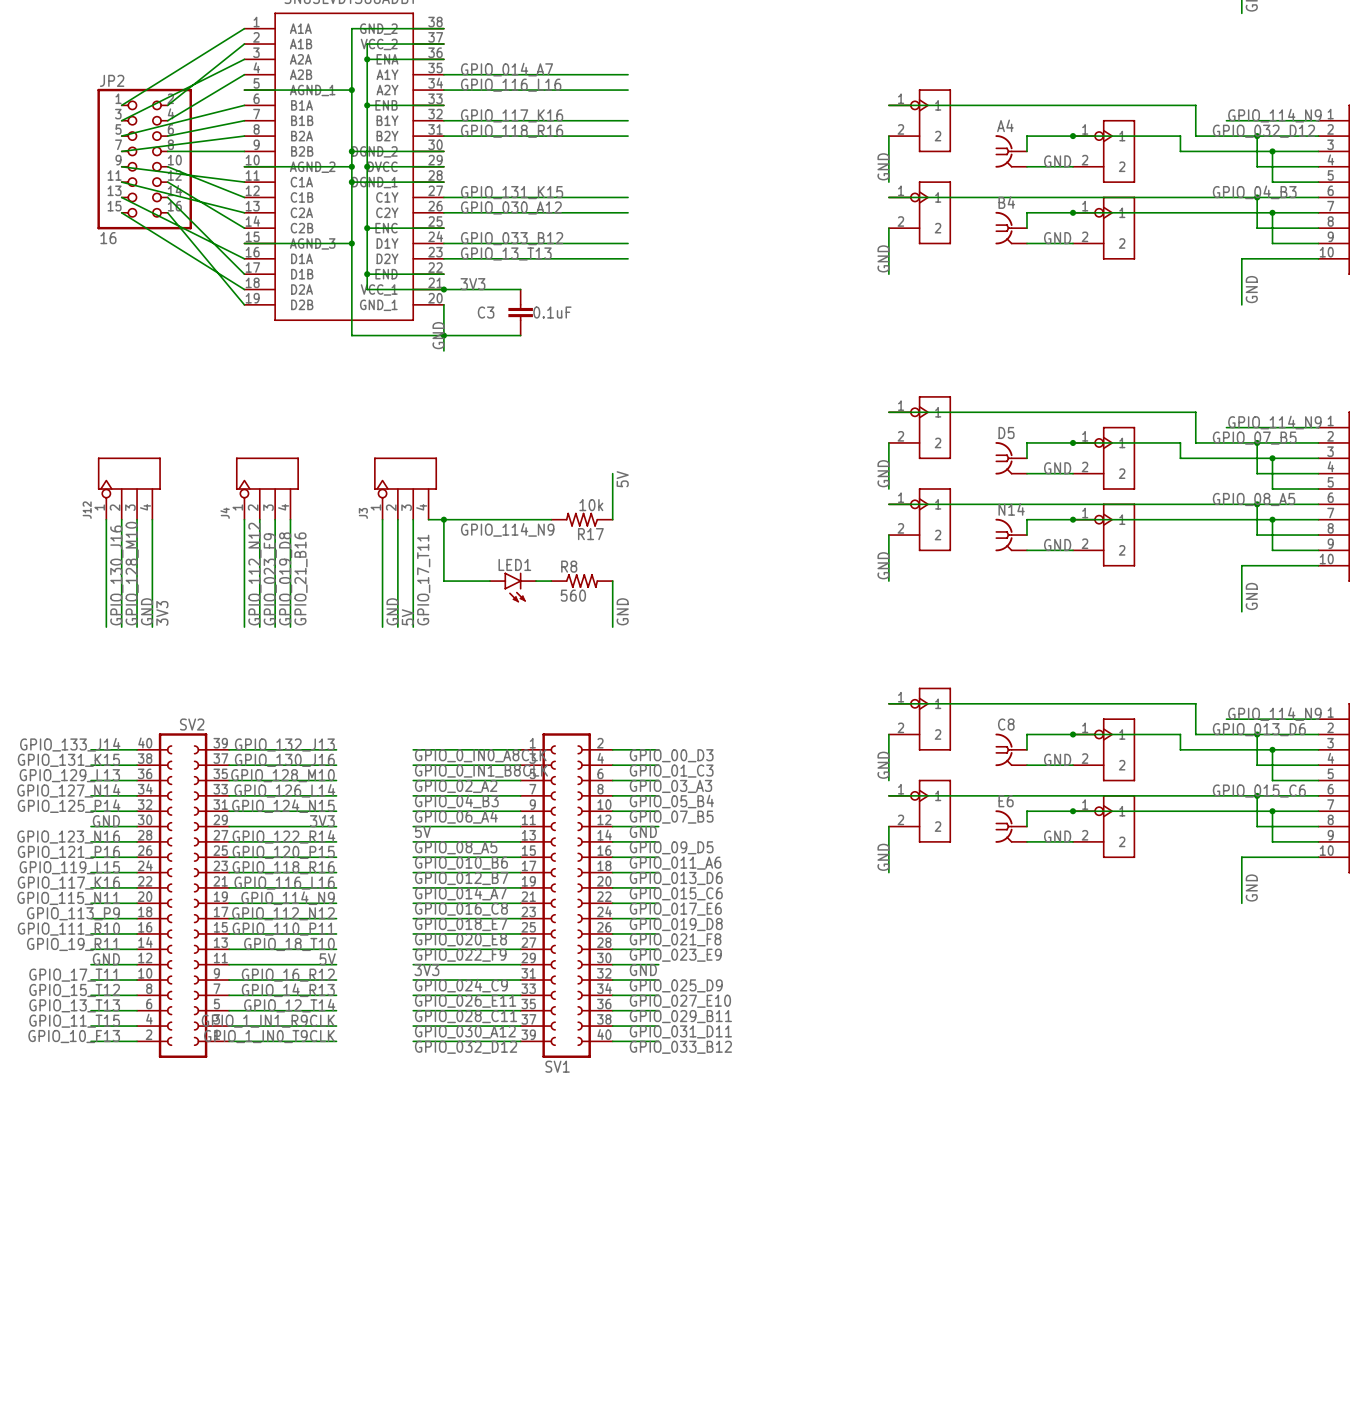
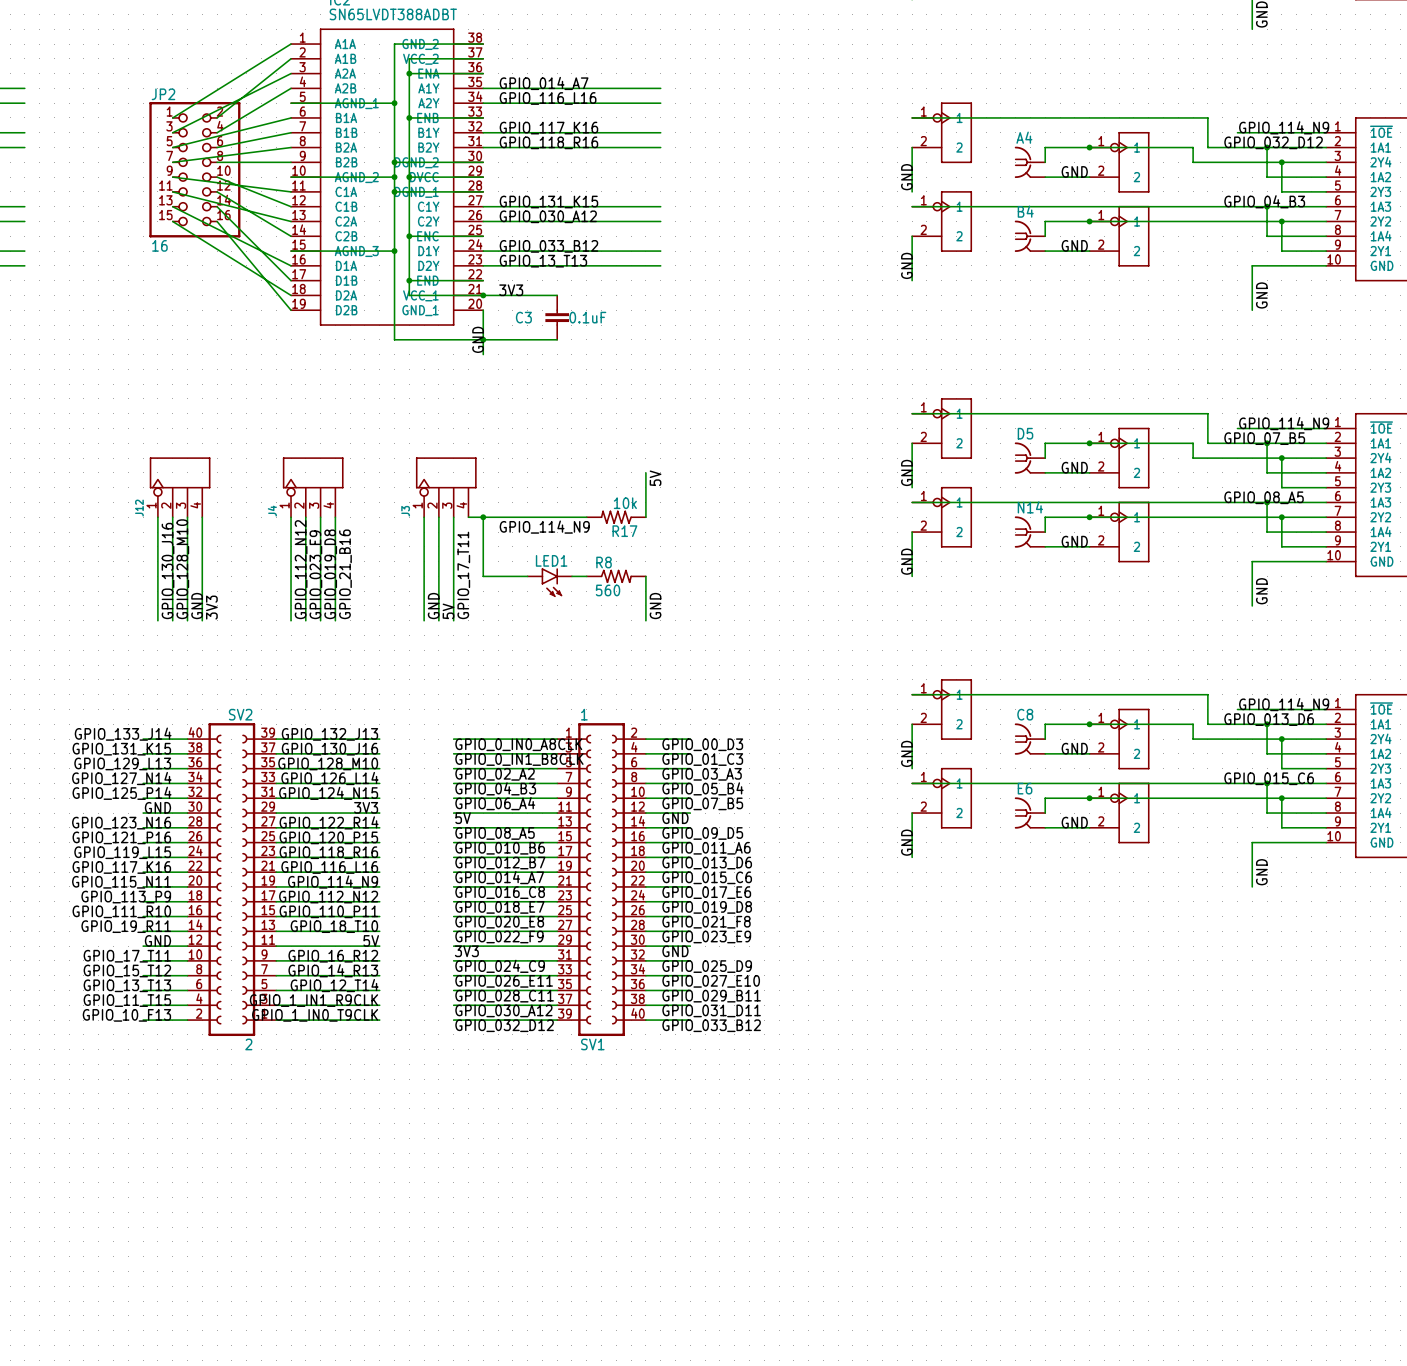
SV1 value: none -> 1 (584, 714)
SV2 value: none -> 2 (248, 1044)

